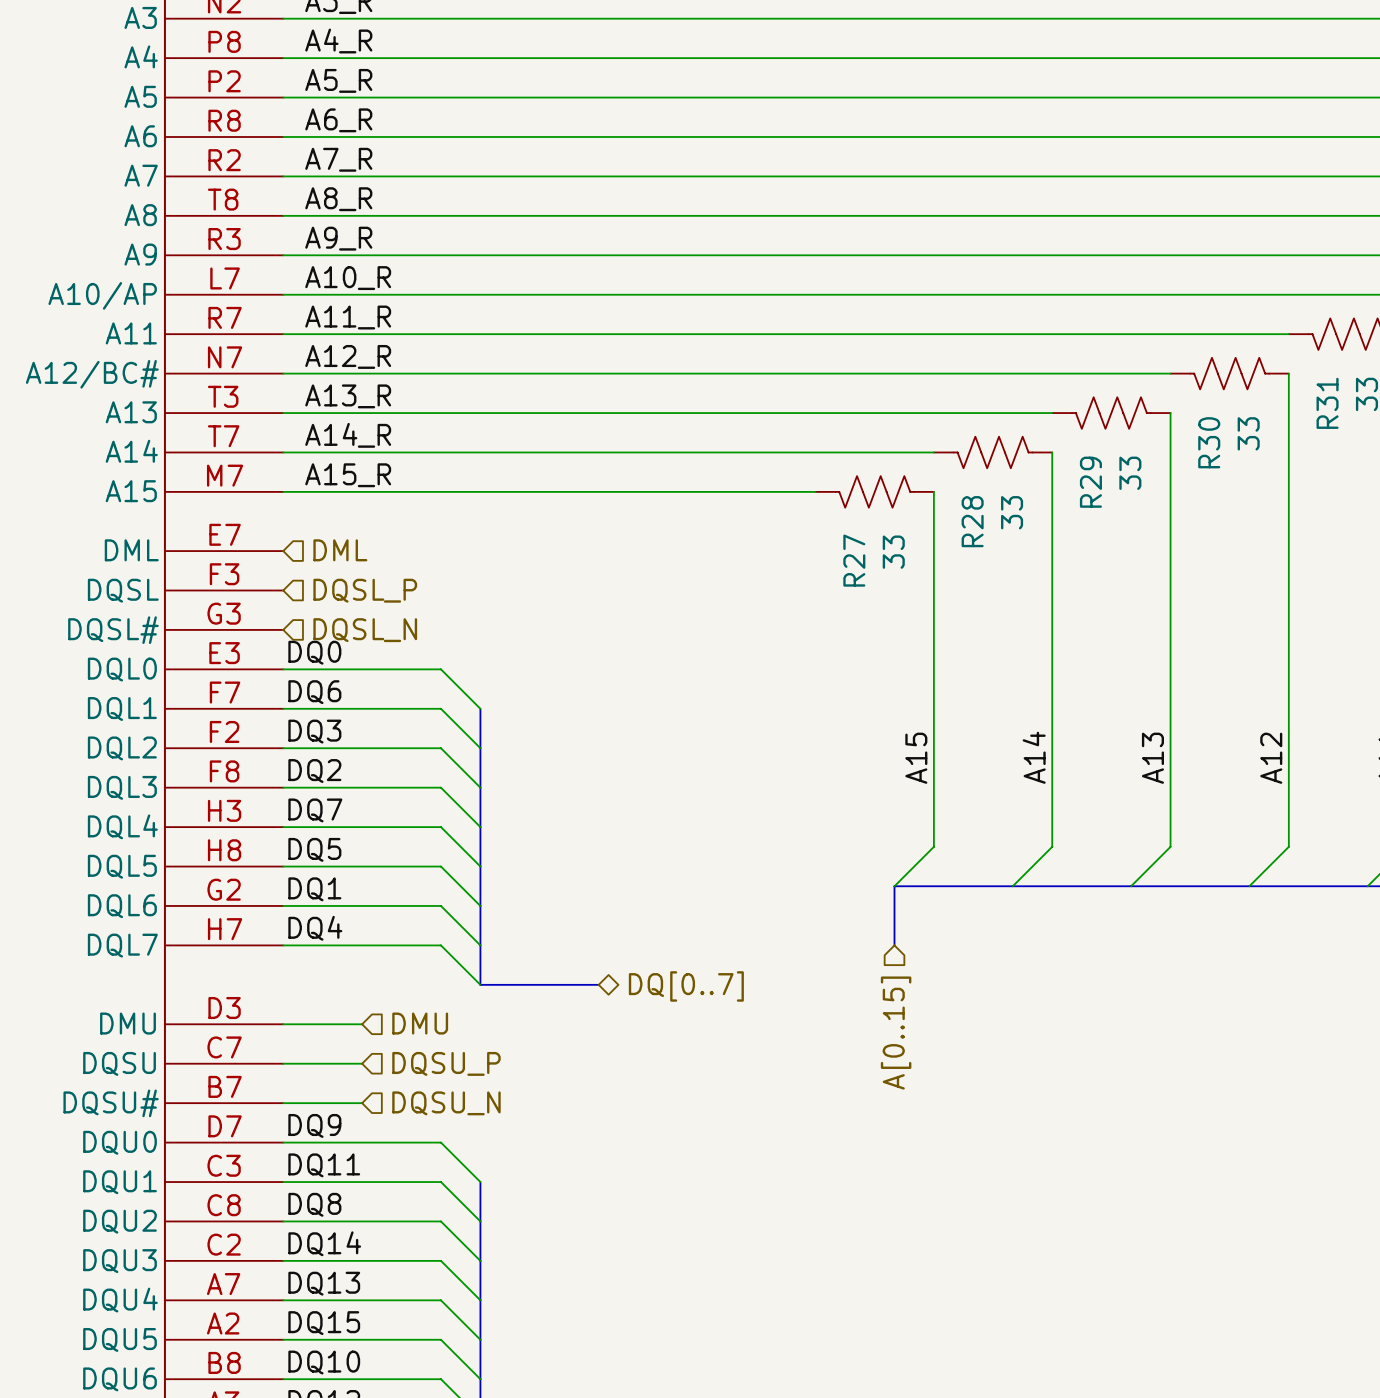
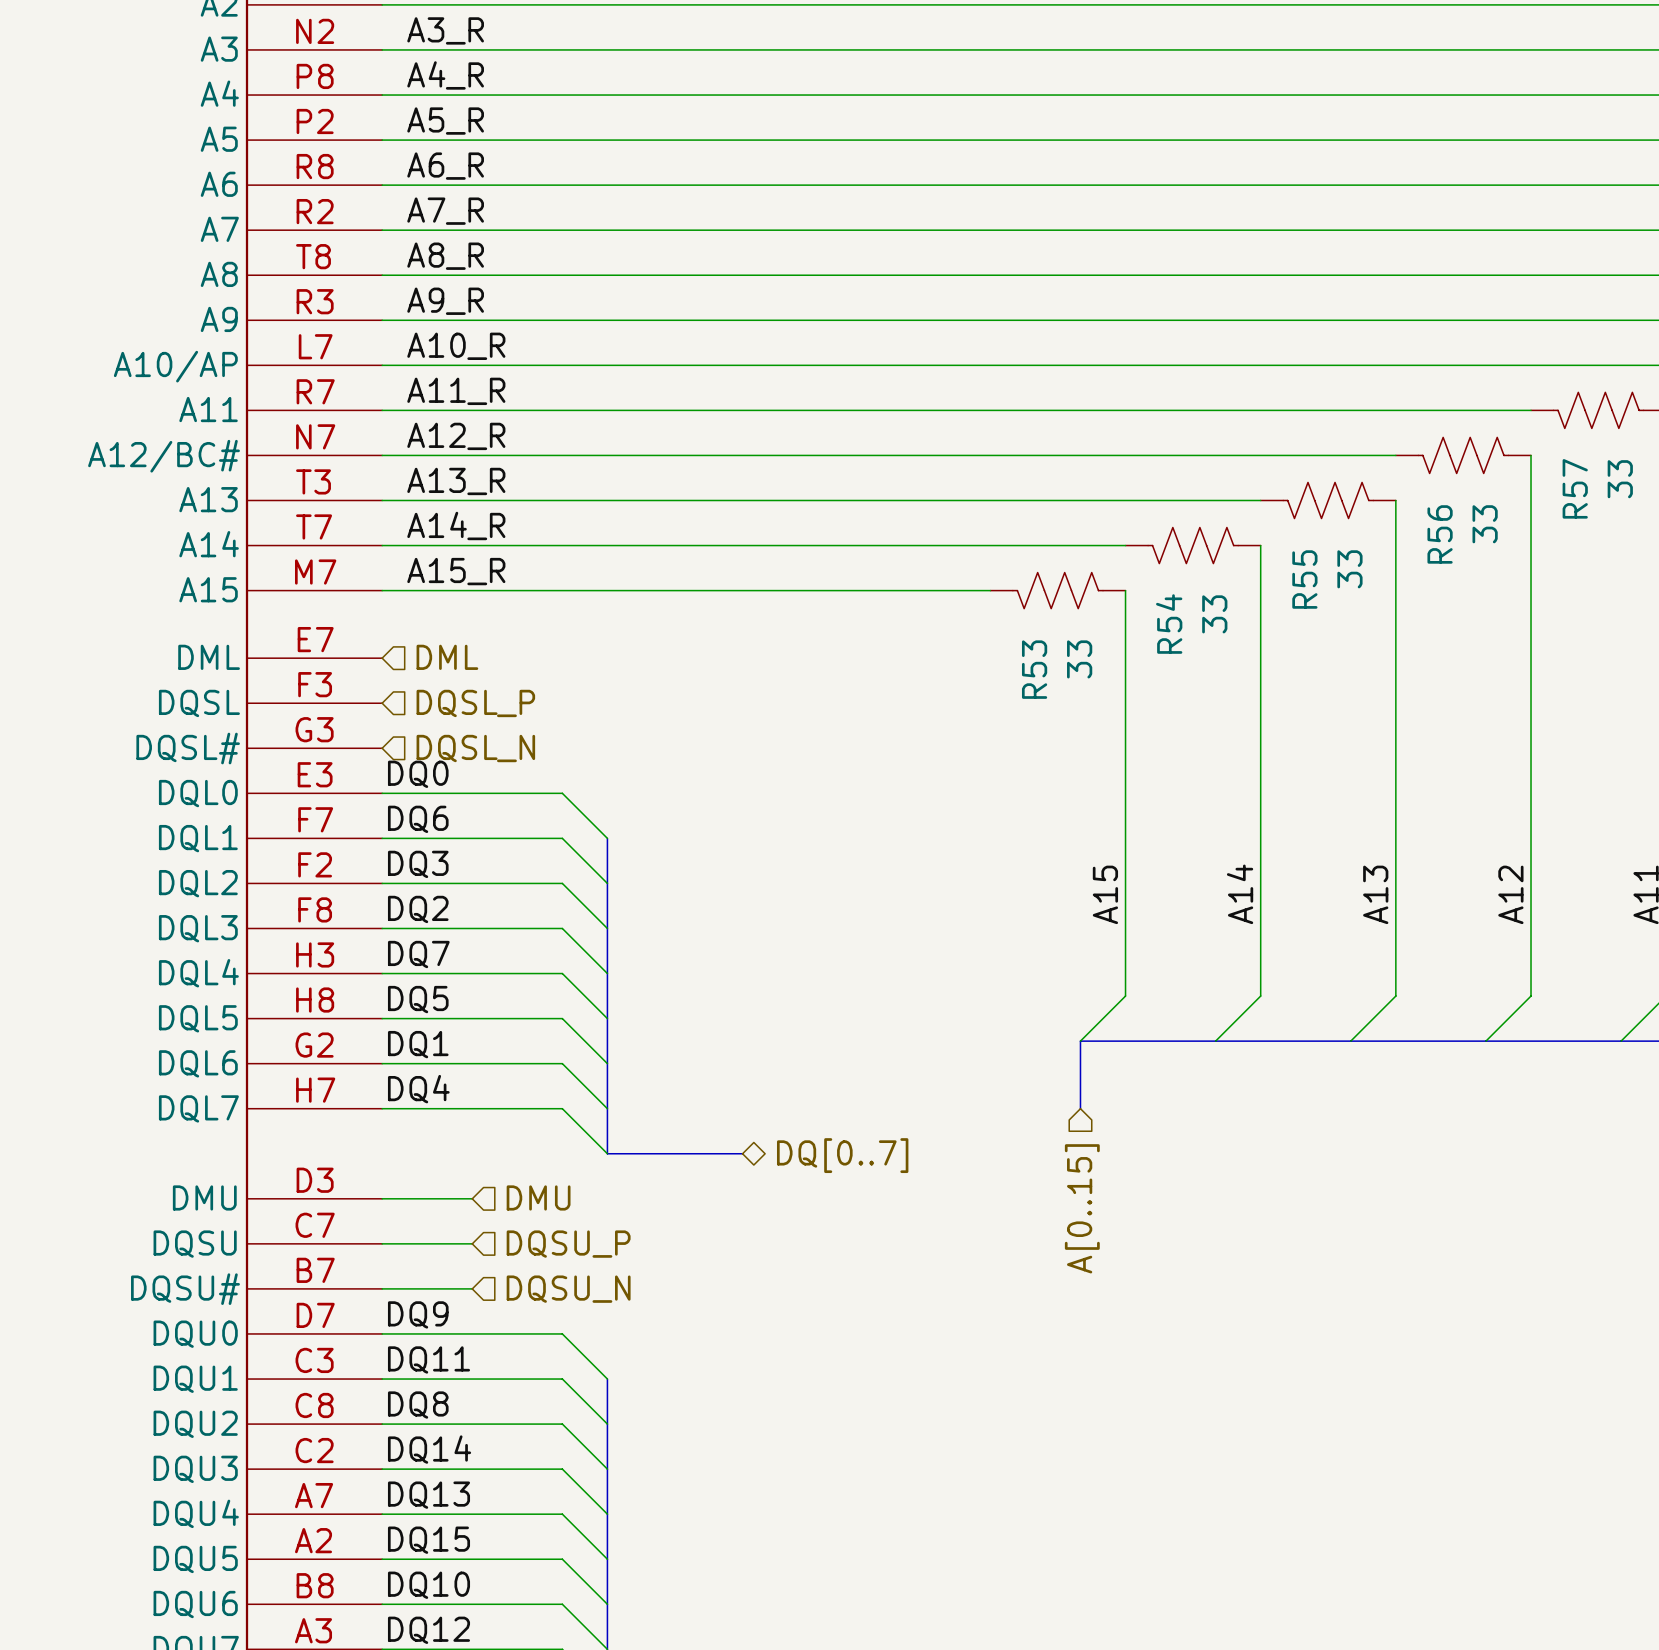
R31 name: R31 (1327, 403) -> R57 (1575, 488)
R30 name: R30 (1209, 442) -> R56 (1440, 534)
R29 name: R29 (1090, 482) -> R55 (1304, 579)
R28 name: R28 (972, 521) -> R54 (1169, 624)
R27 name: R27 (854, 560) -> R53 (1034, 669)

